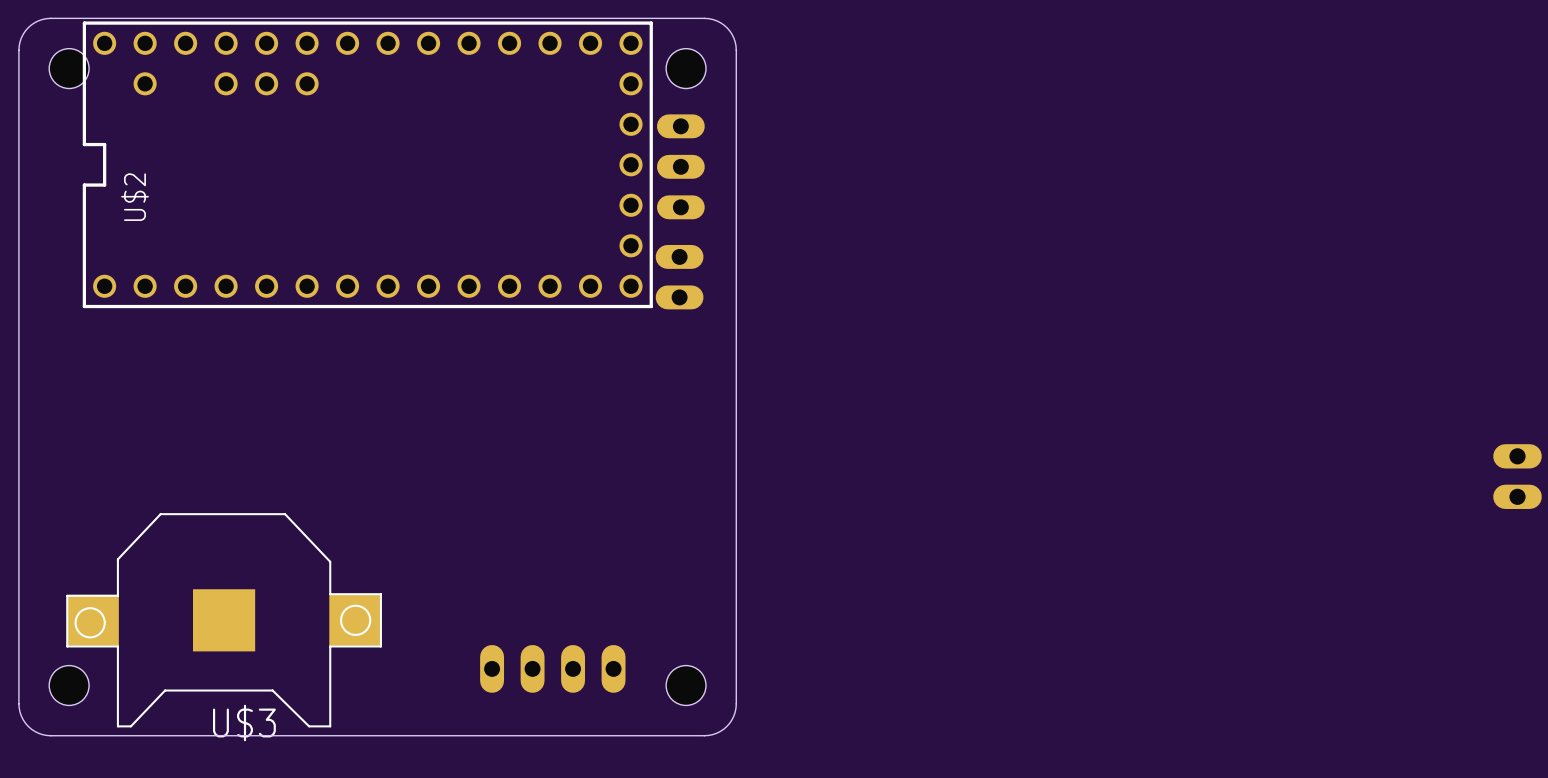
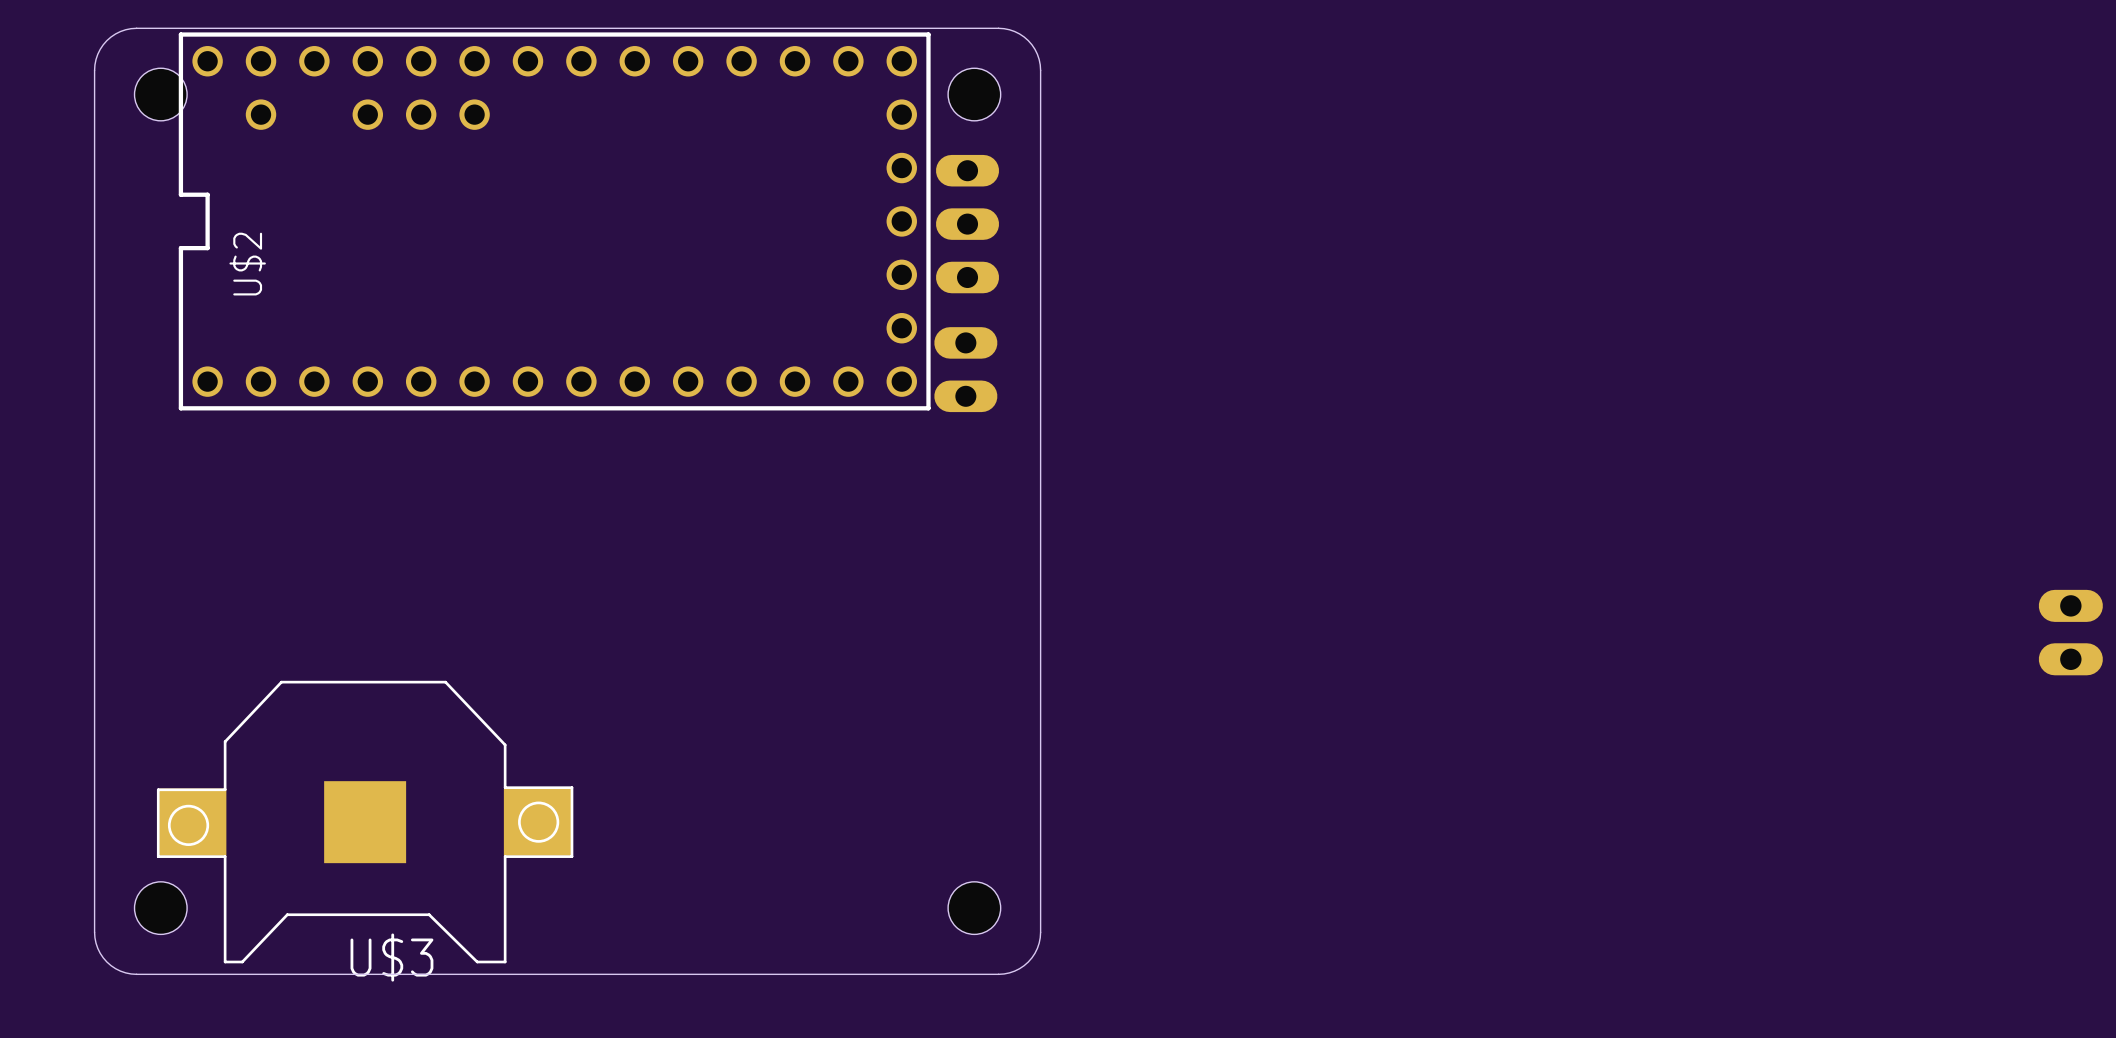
part: (552, 668) -> none

